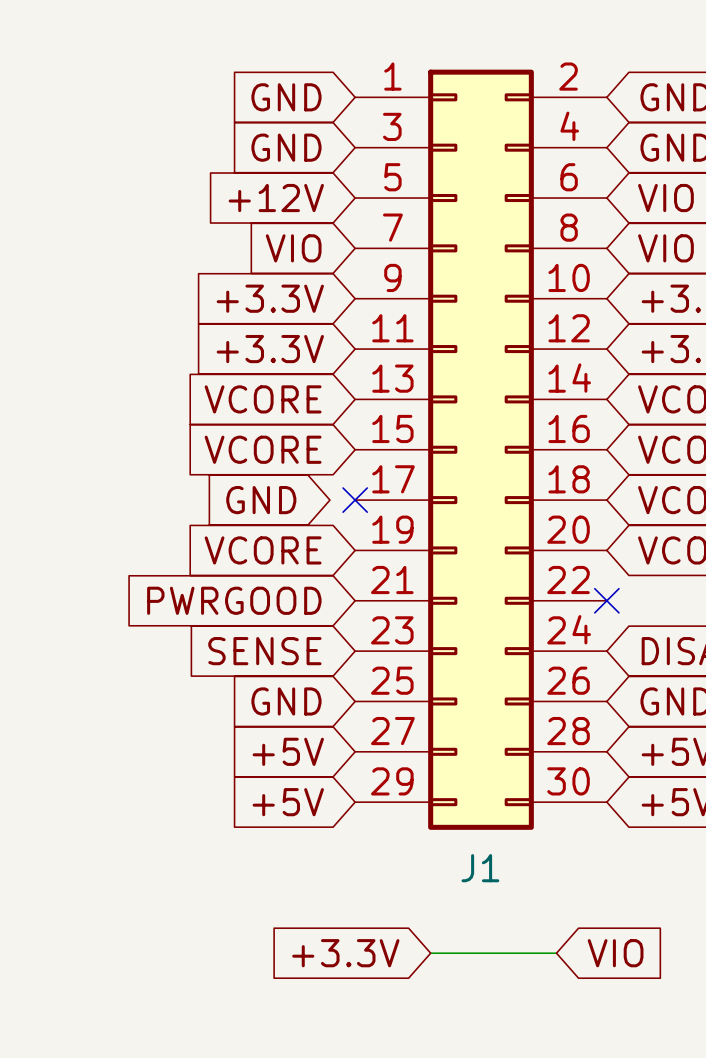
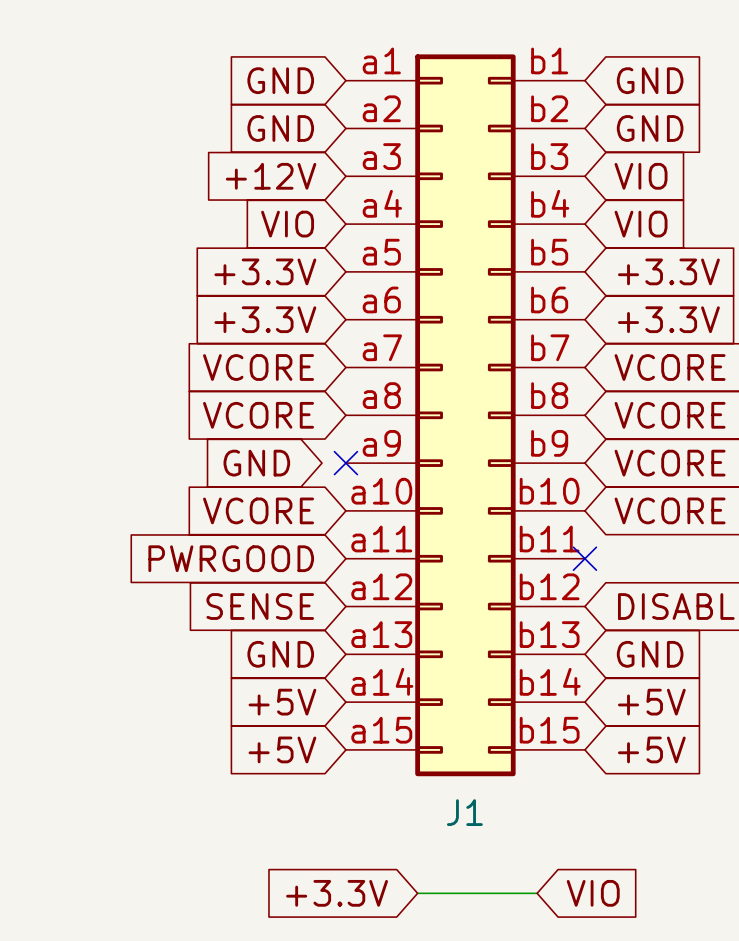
J1 symbol: [355, 69, 607, 830] -> [345, 54, 585, 777]

